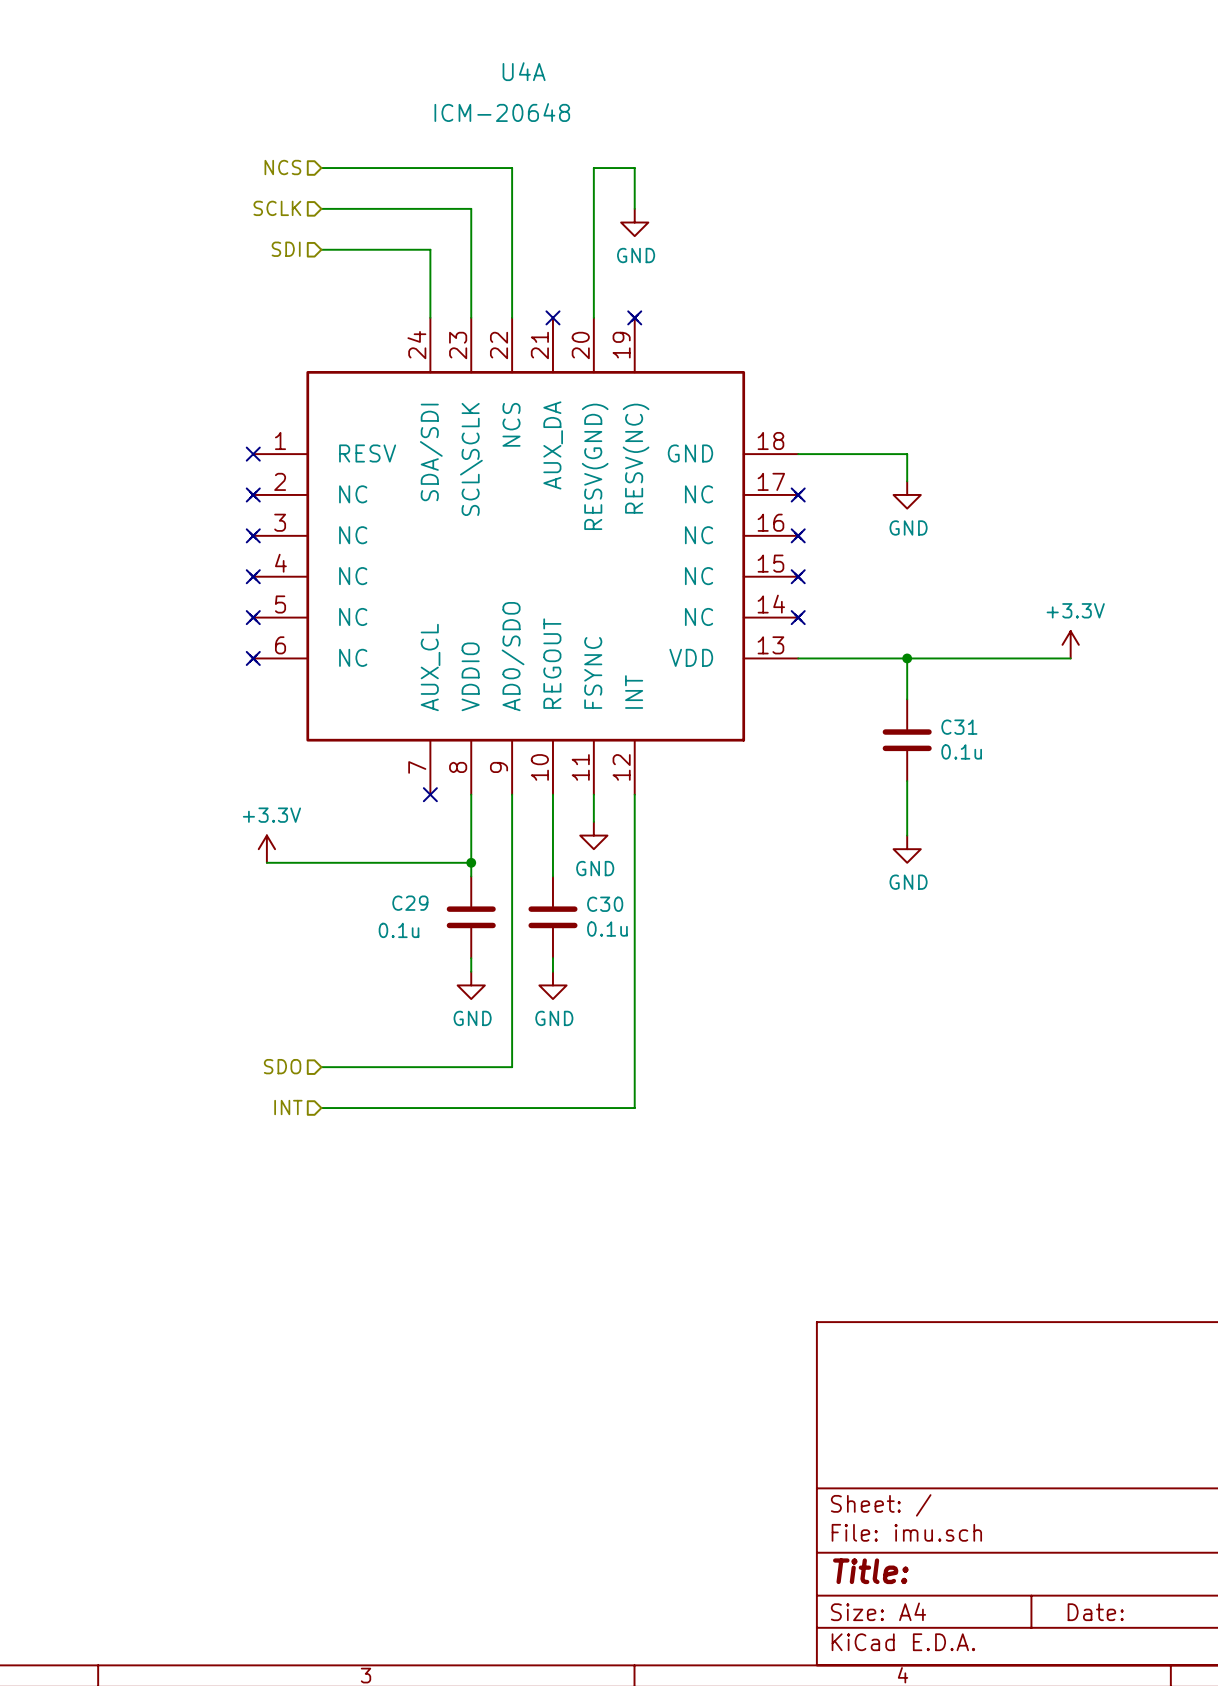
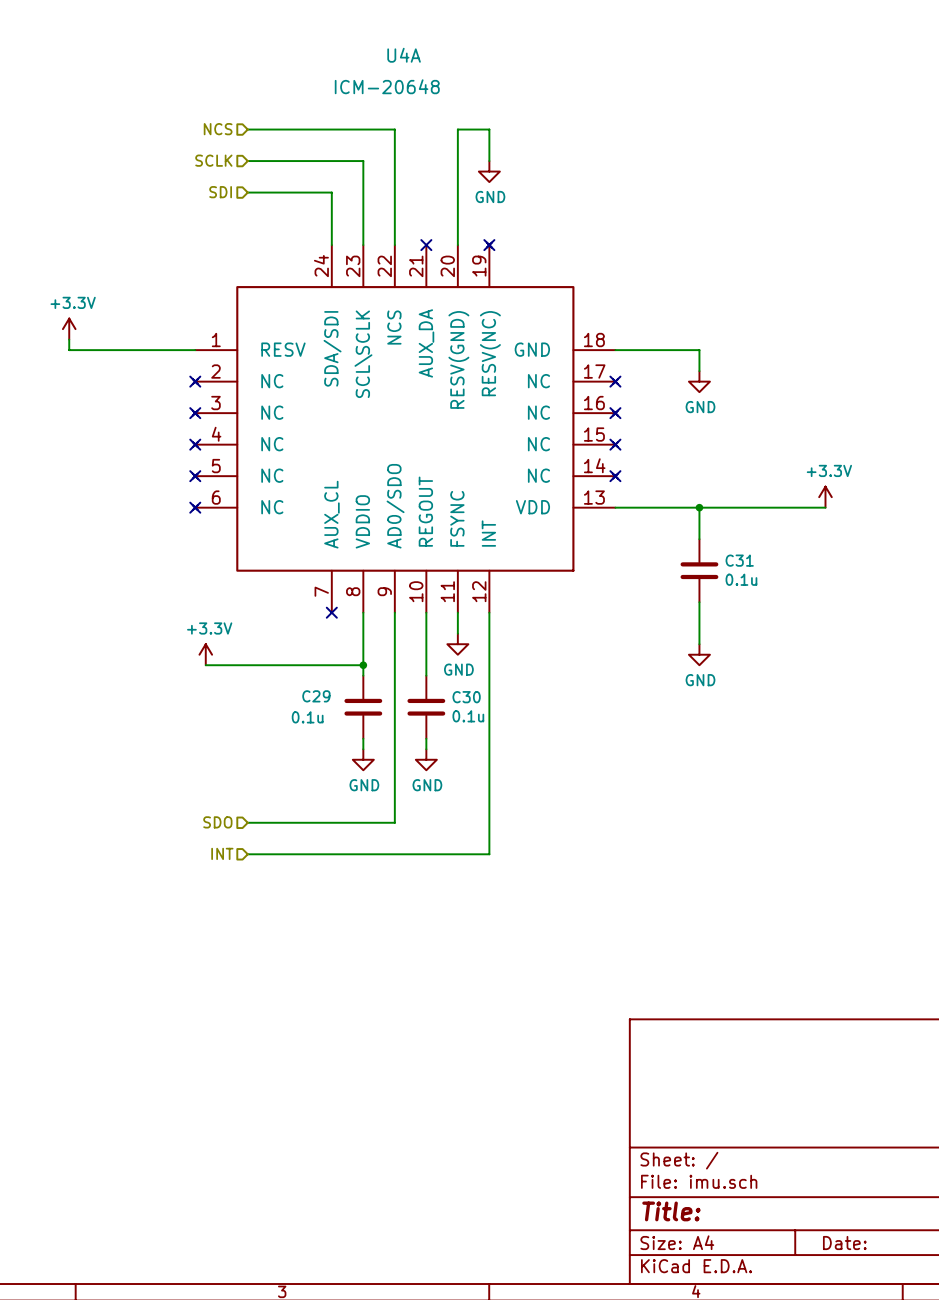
power symbol: none -> +3.3V (69, 329)
wire: none -> (69, 339) (69, 350) (195, 350)
no-connect mark: (253, 454) -> none

